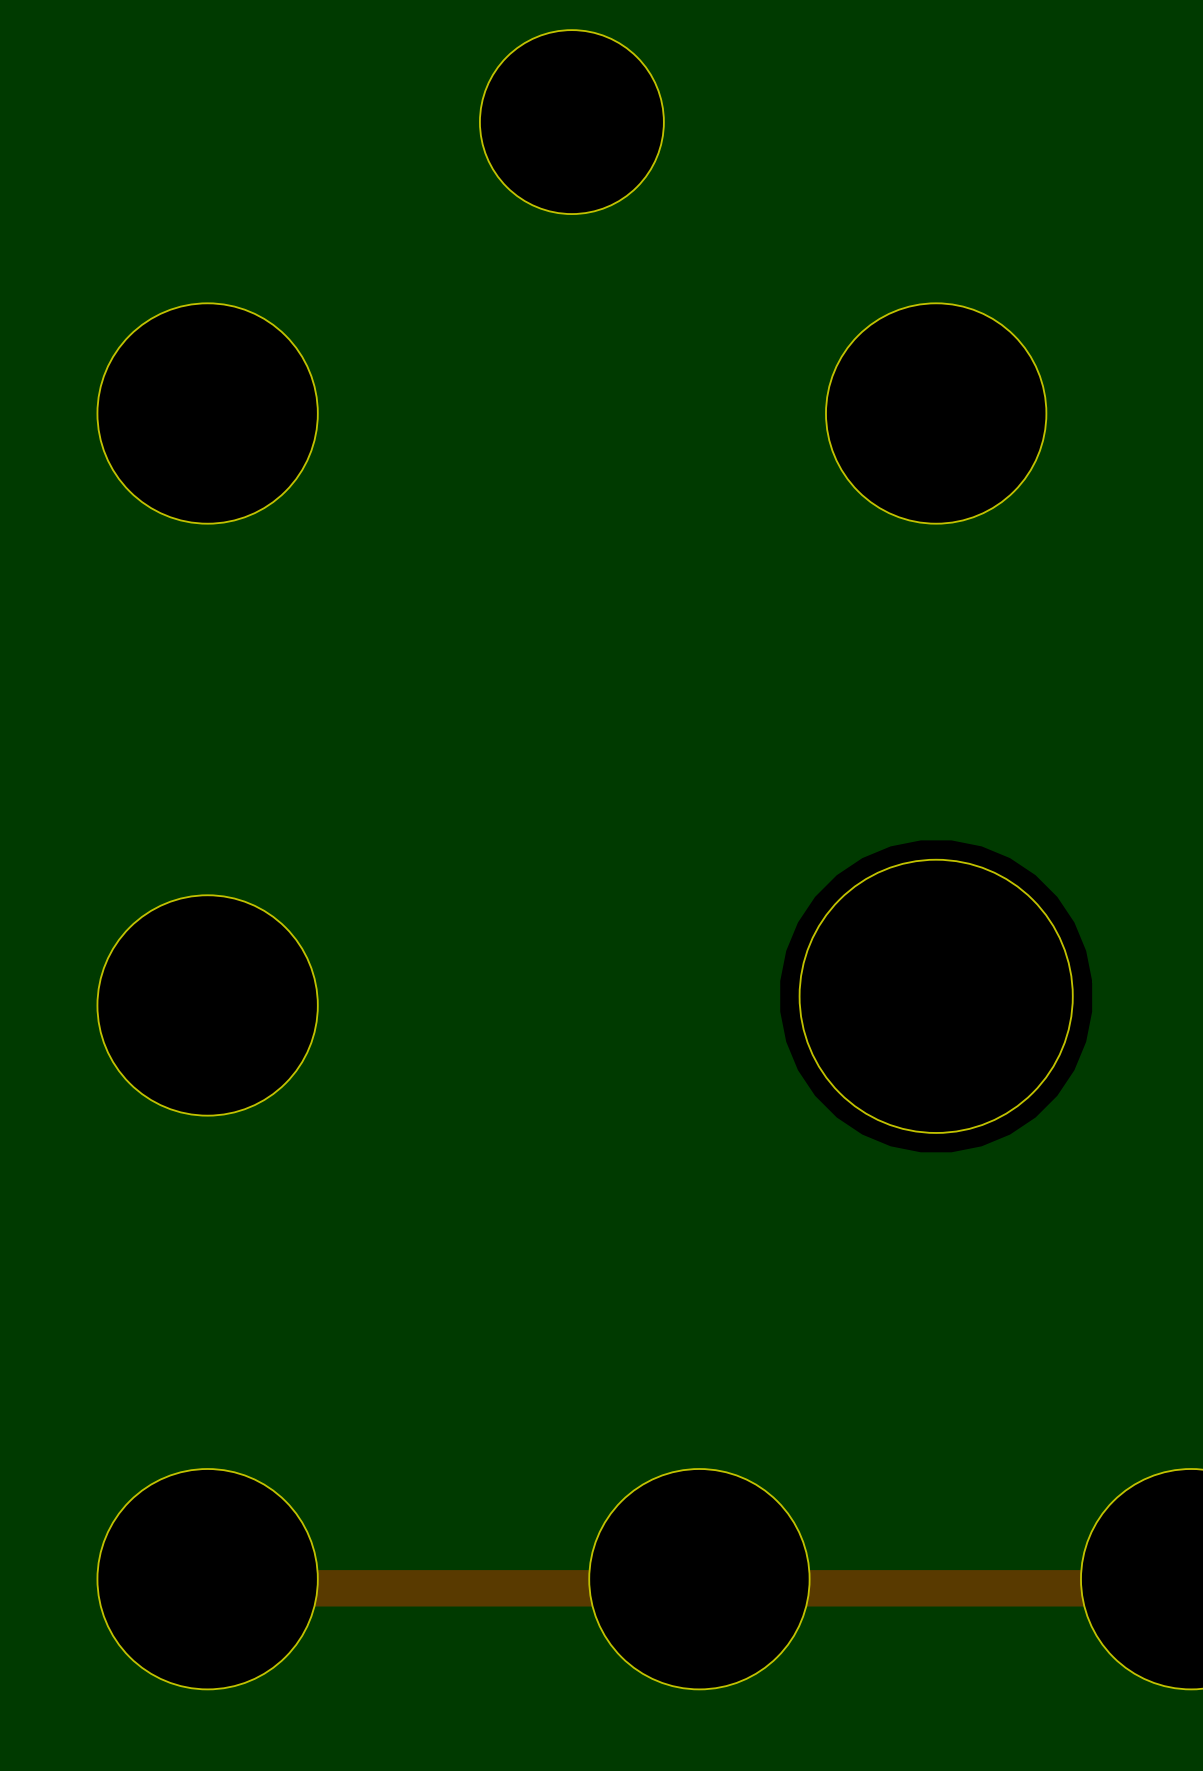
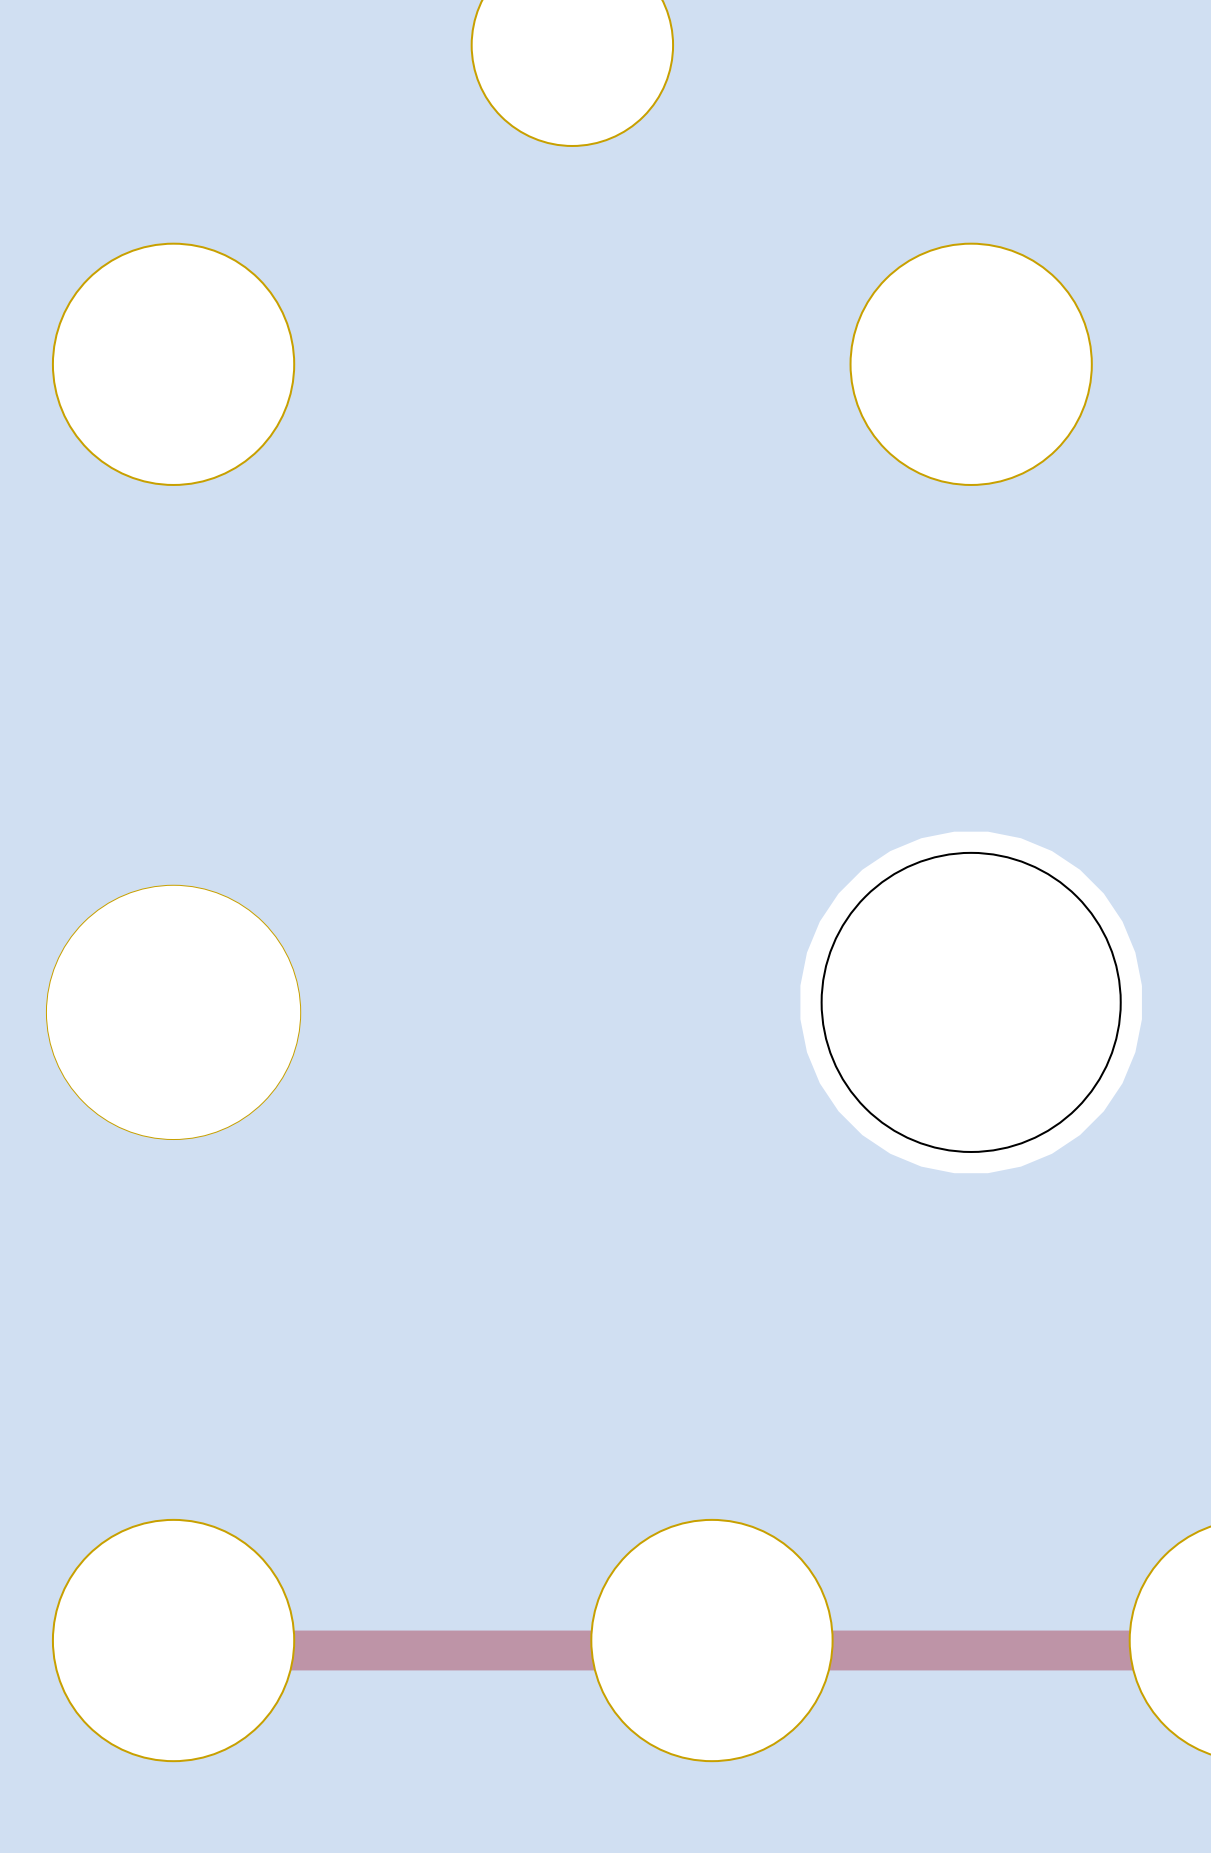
part footprint: [96, 894, 319, 1117] -> [45, 884, 302, 1141]

